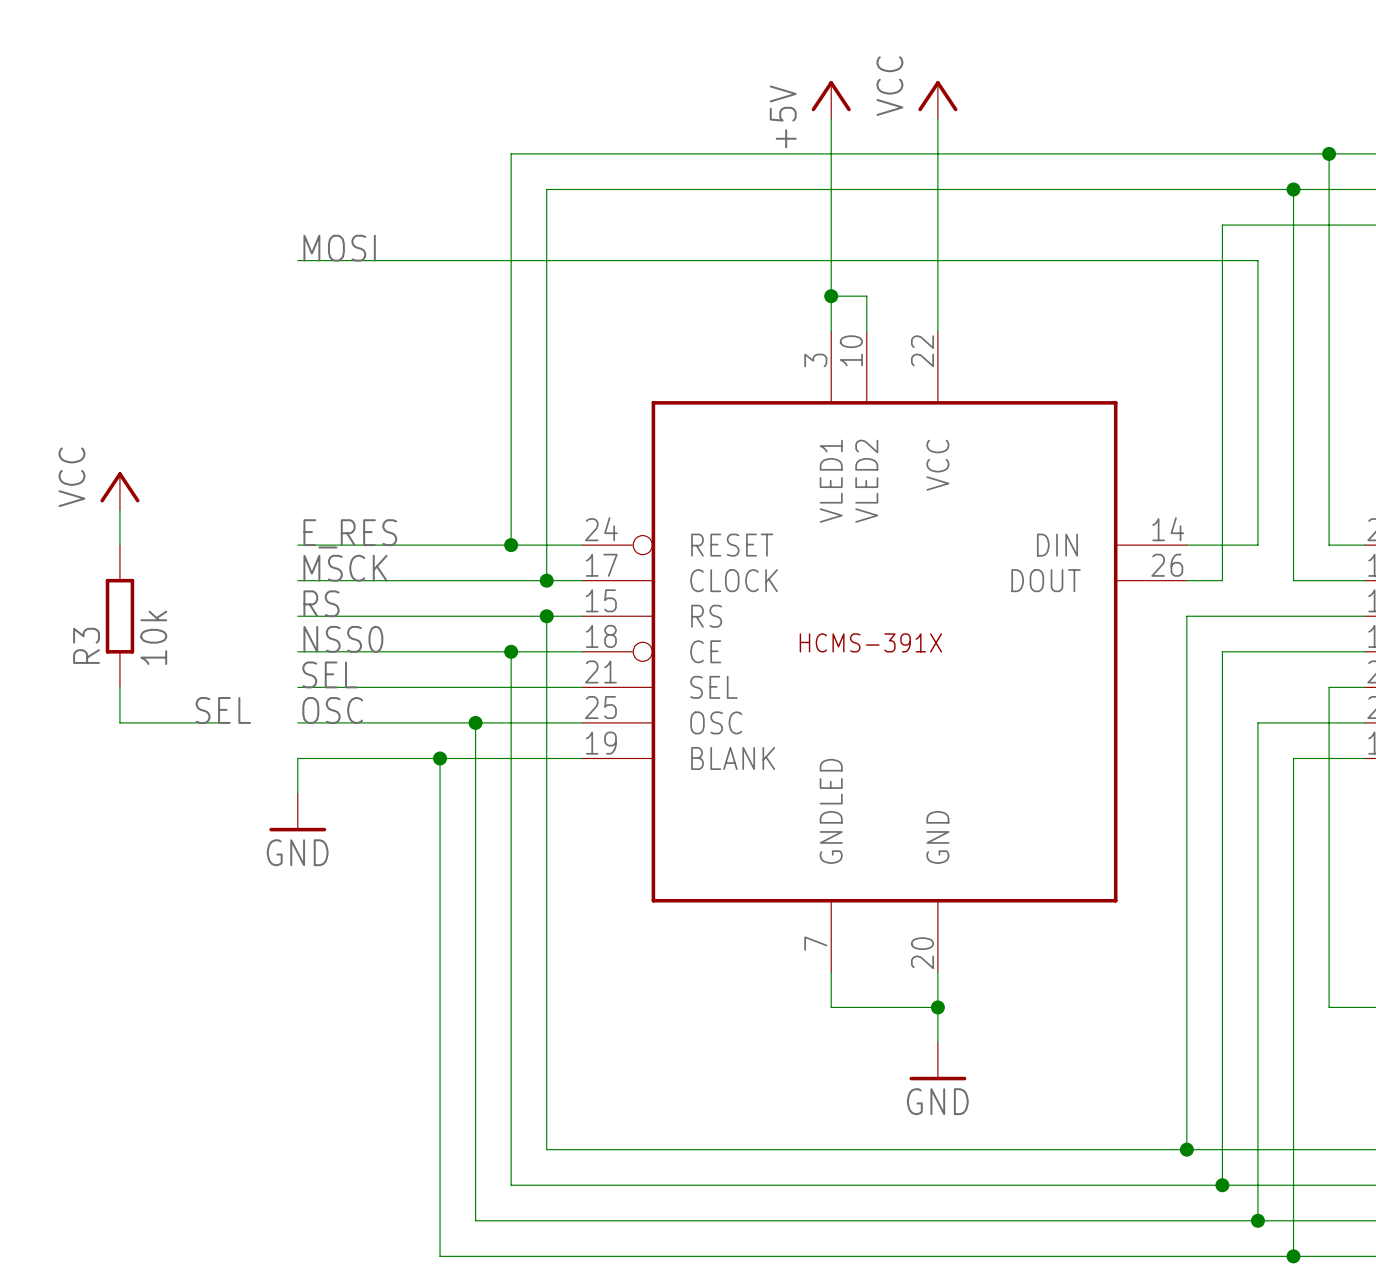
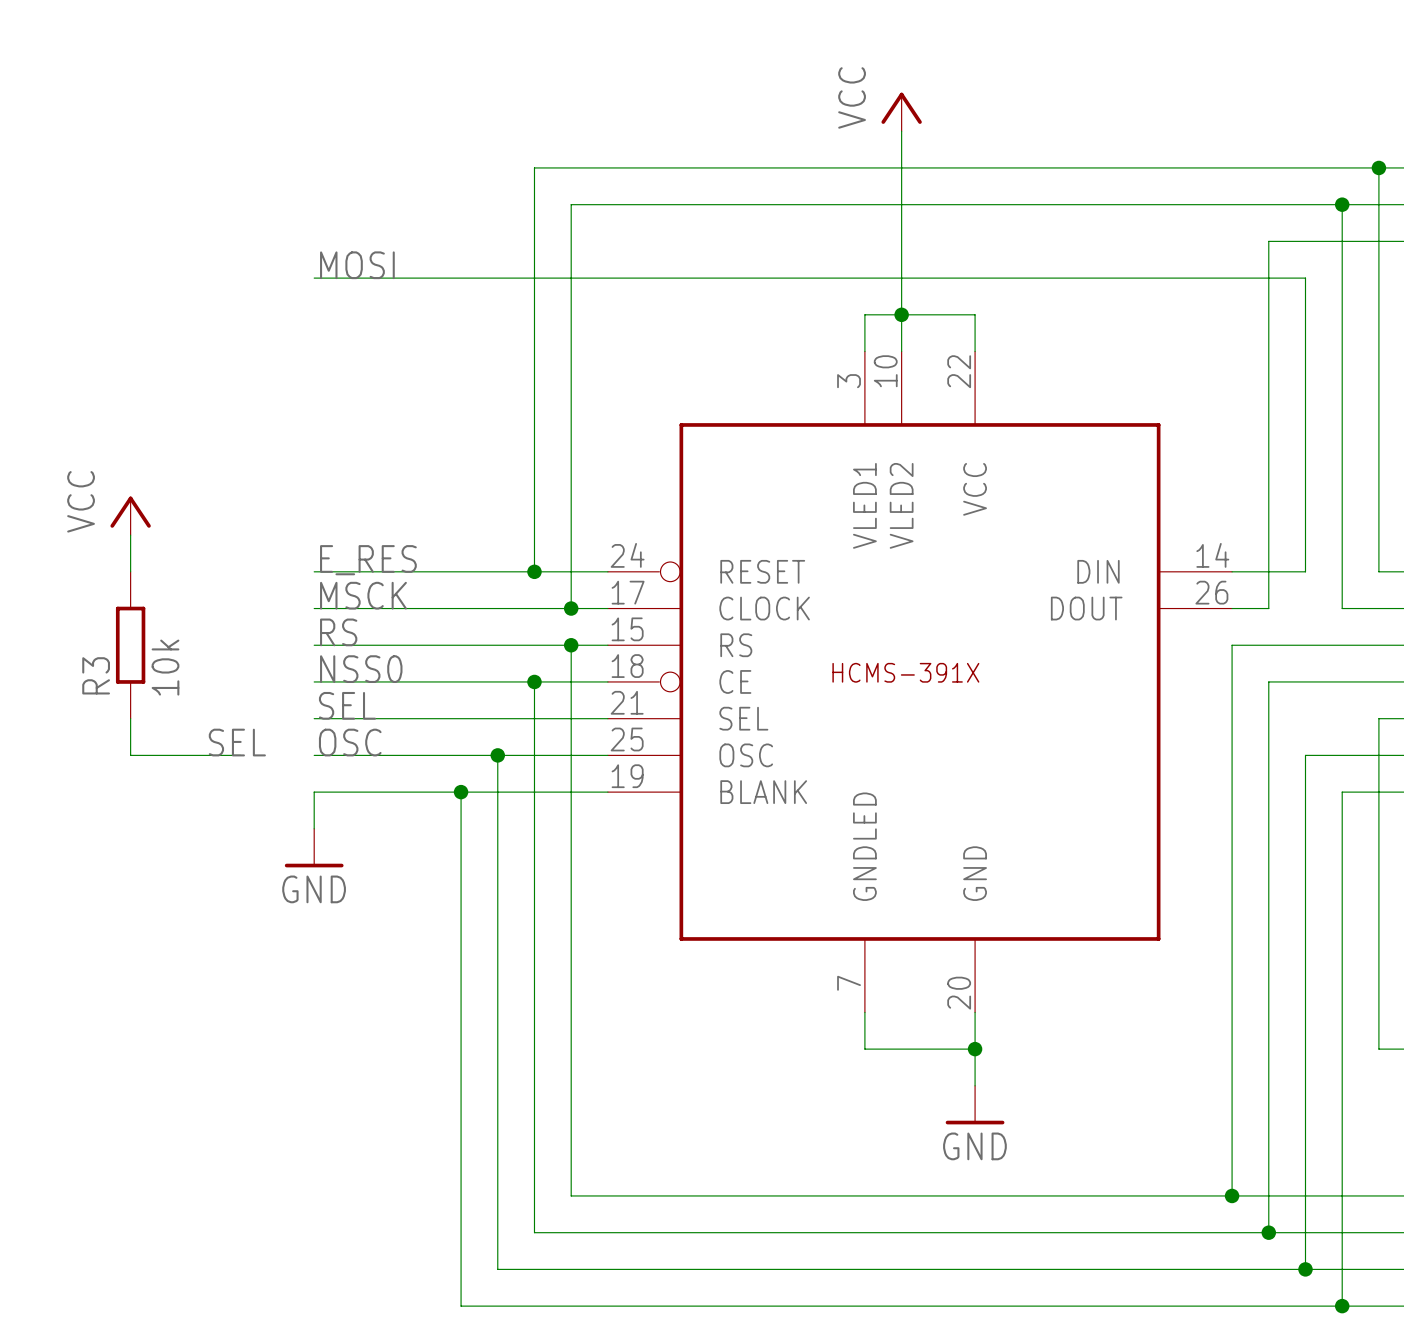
power symbol: +5V (831, 99) -> none
power symbol position: VCC (937, 99) -> VCC (901, 111)
wire: (831, 118) (831, 296) -> none
wire: (937, 118) (937, 296) -> (901, 131) (901, 314) (975, 314)
junction position: (831, 296) -> (901, 314)

